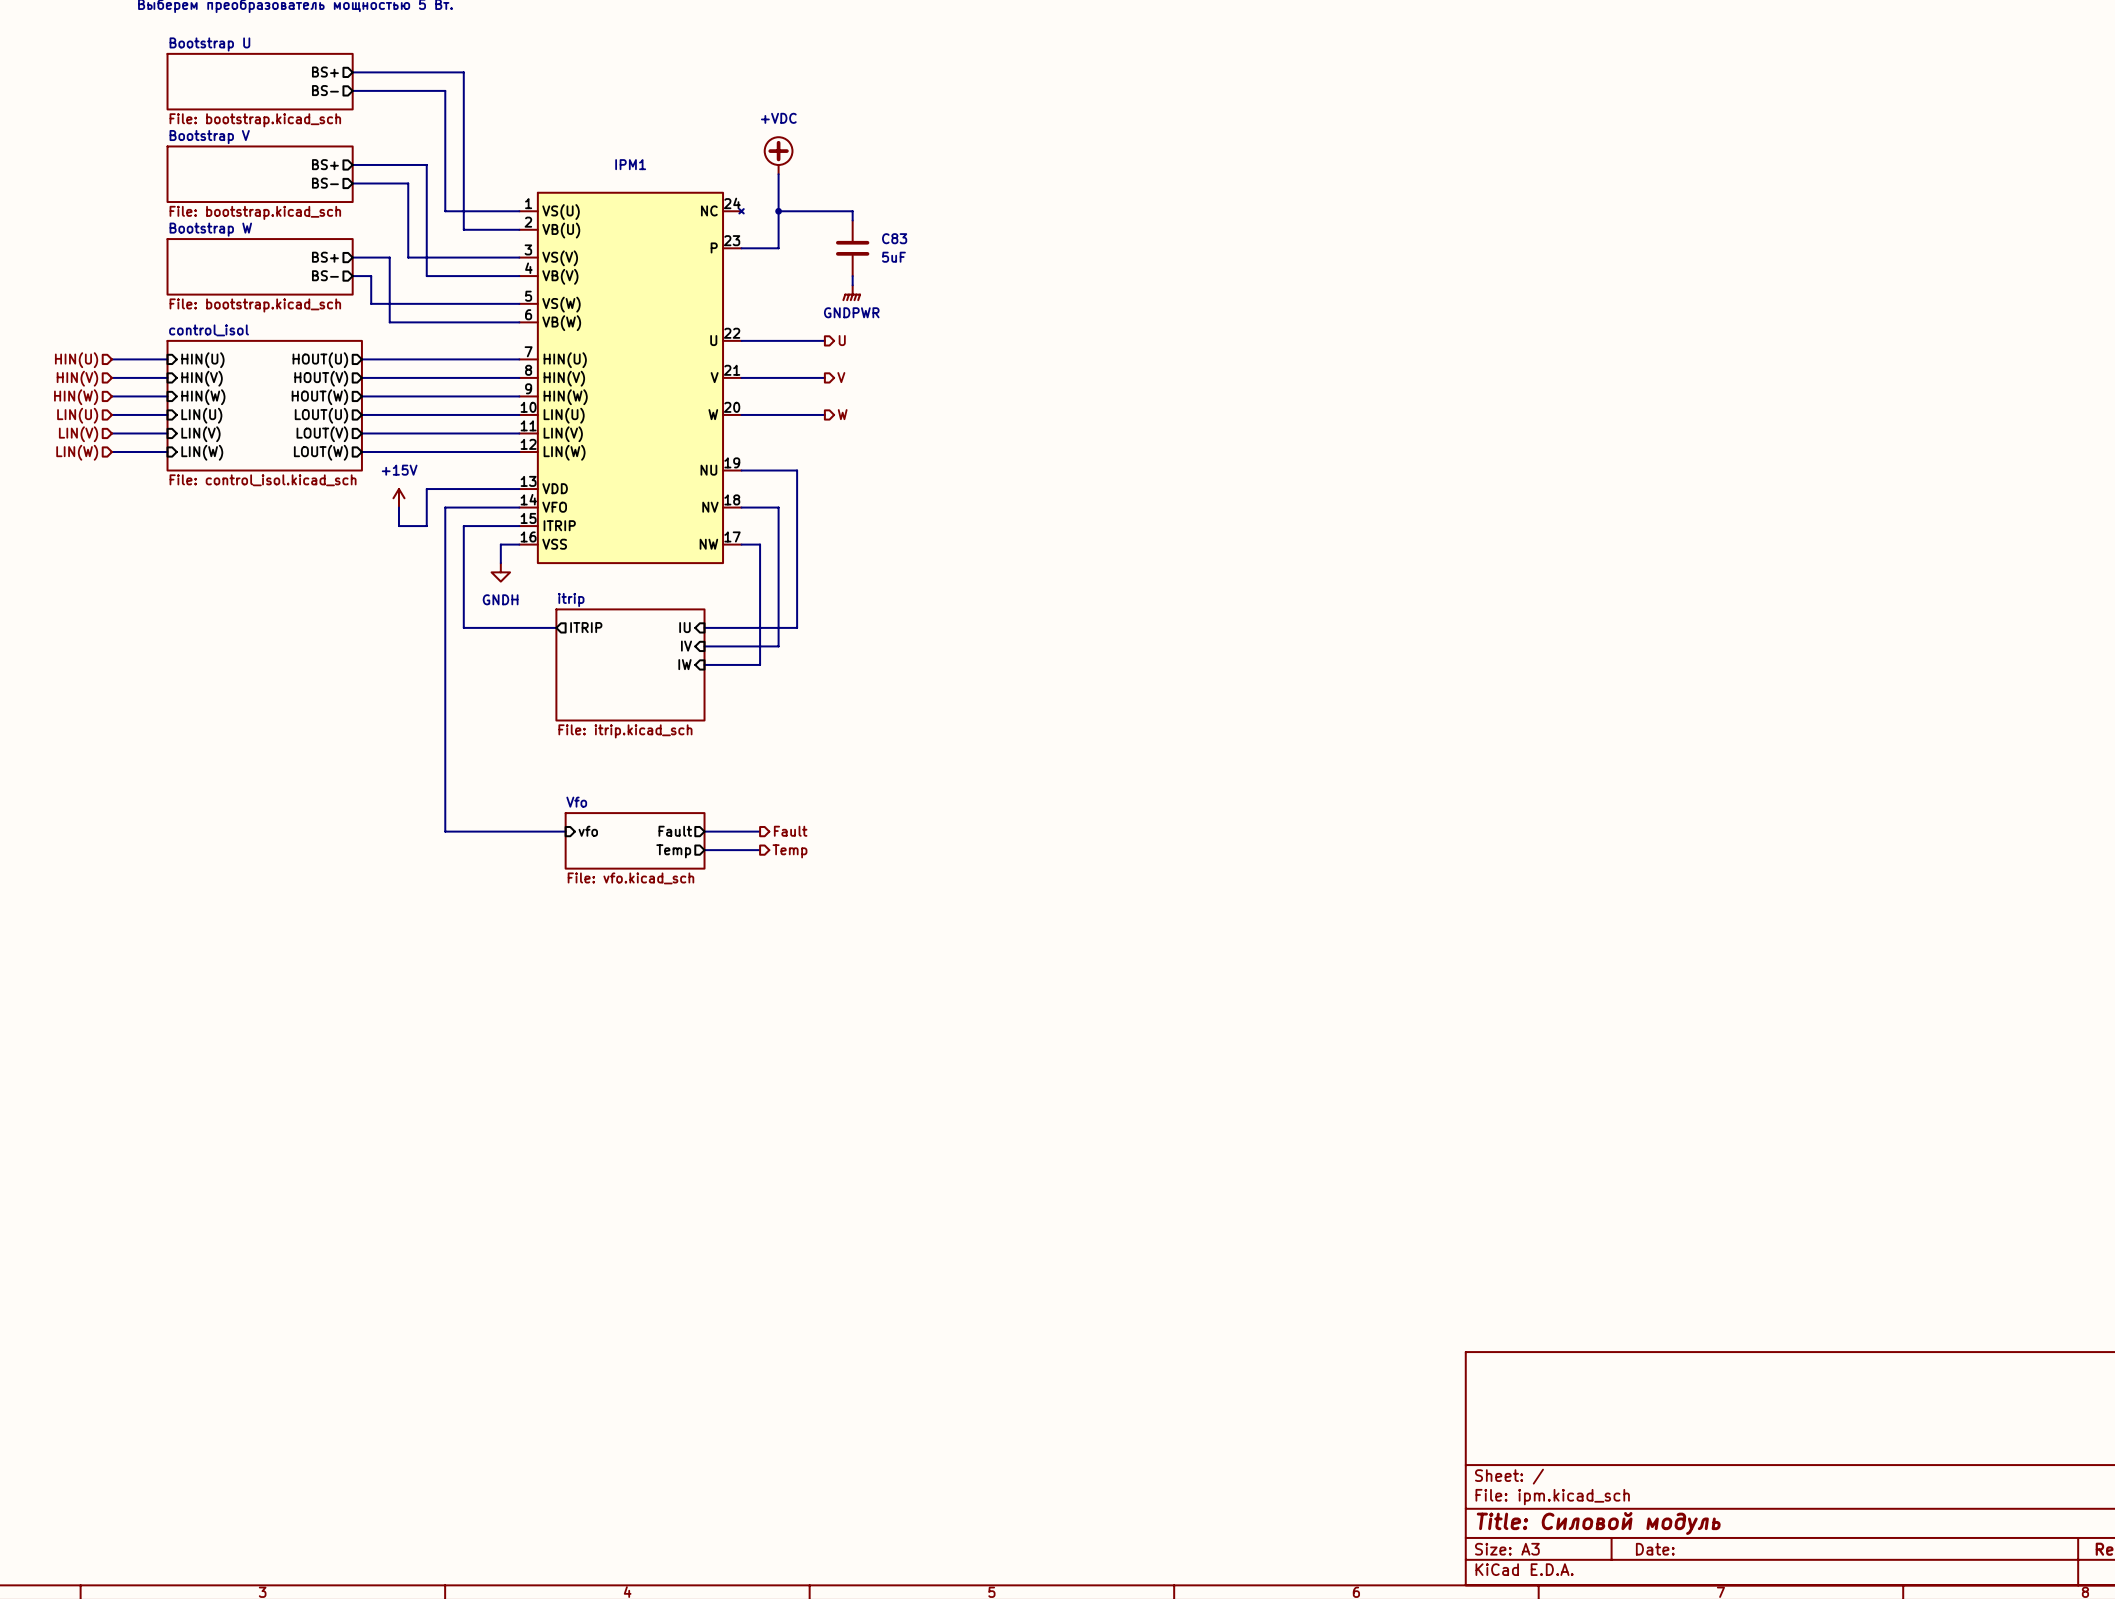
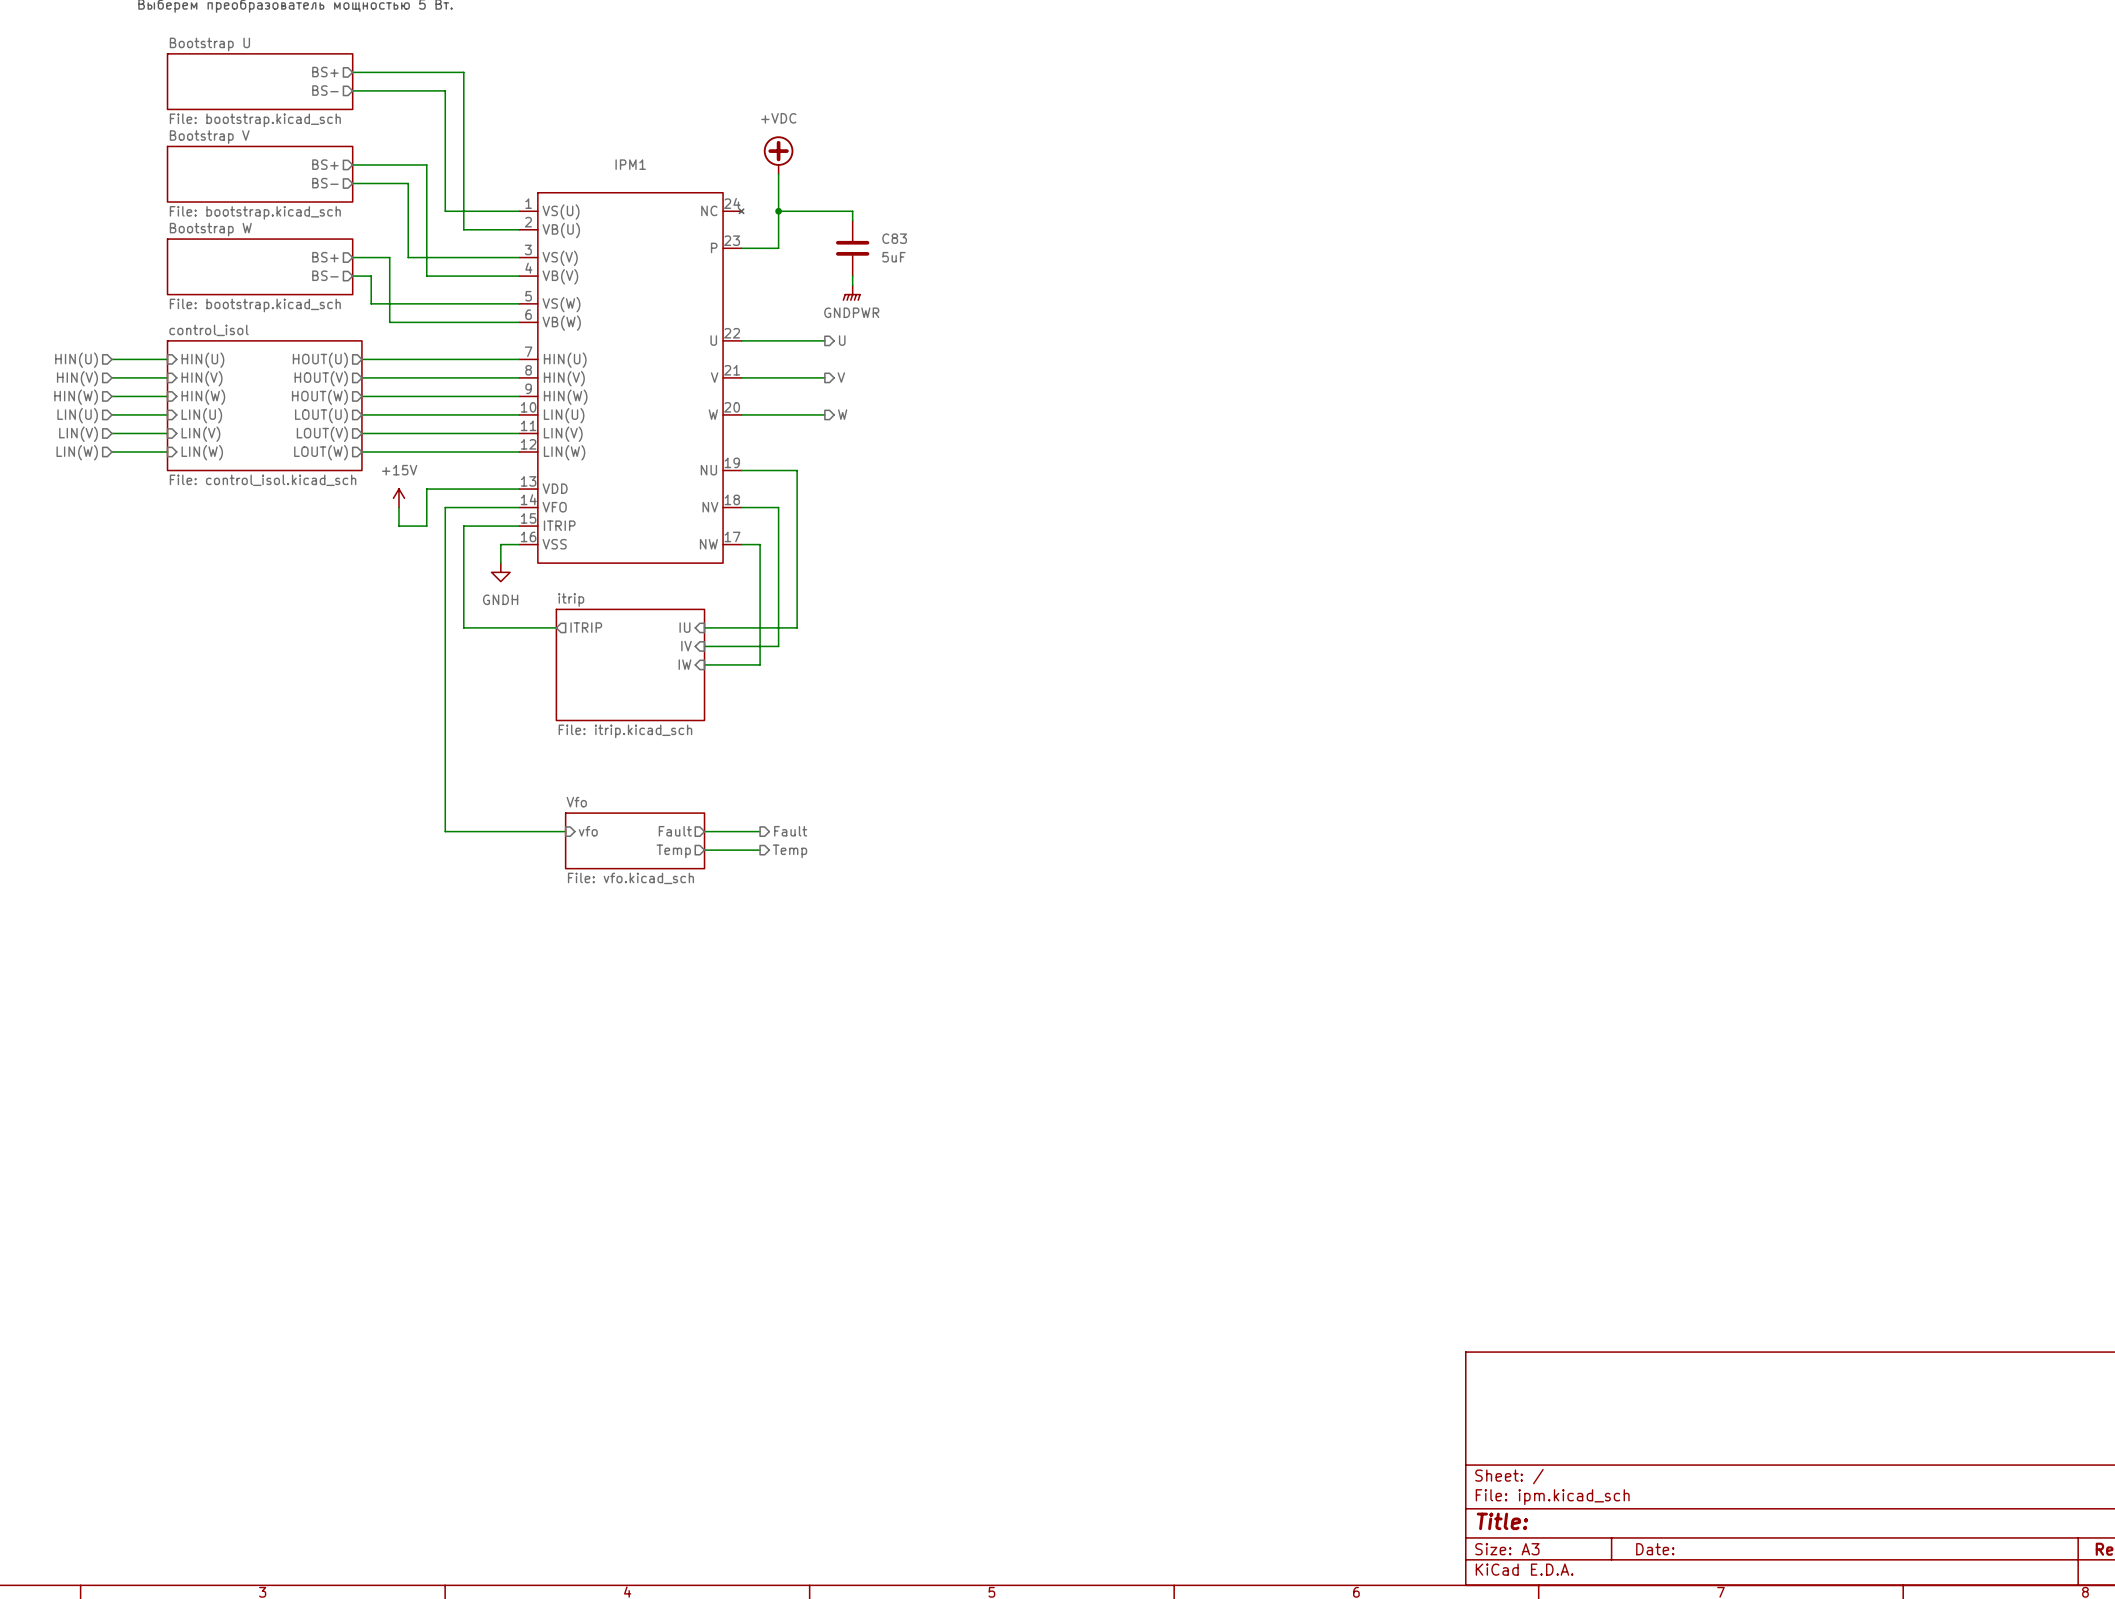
title block: Title: Силовой модуль (1598, 1523) -> Title: (1502, 1521)

